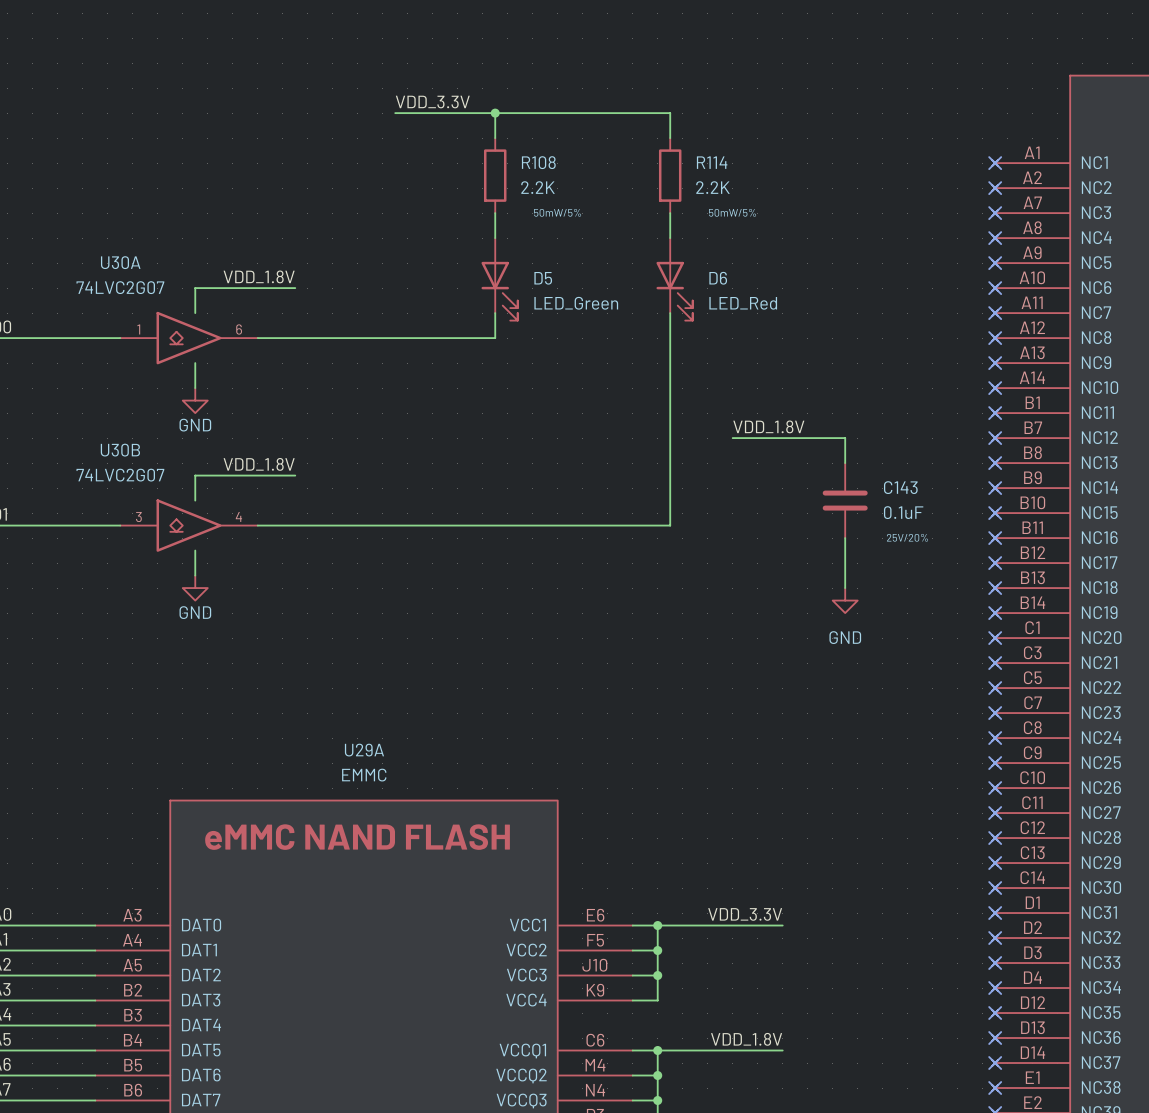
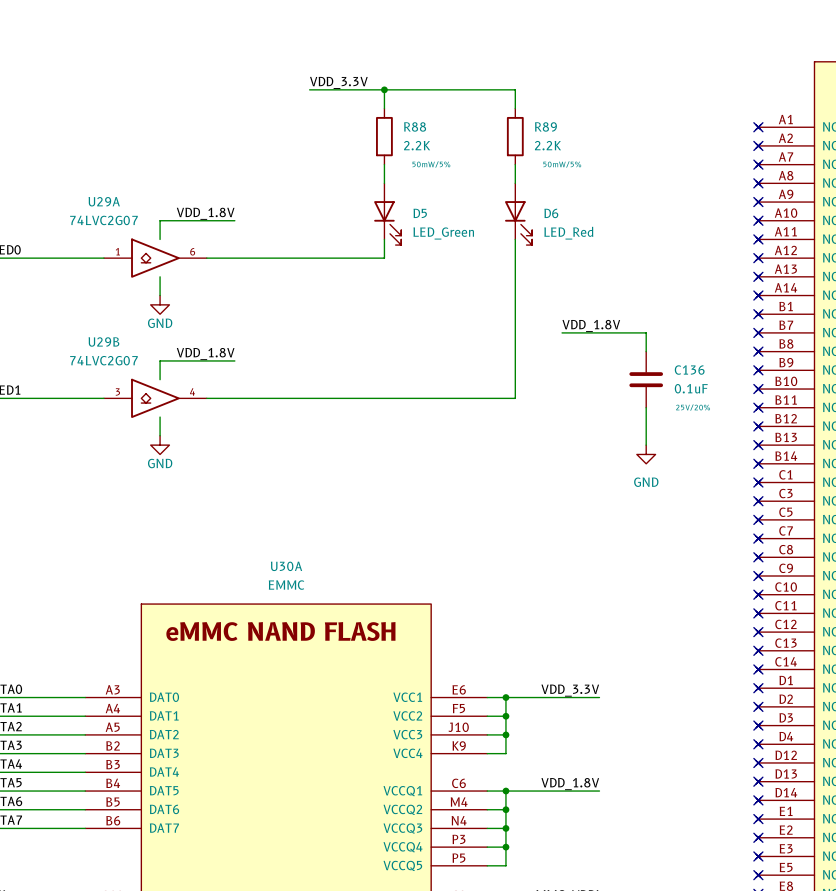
R108 name: R108 (538, 162) -> R88 (415, 126)
R114 name: R114 (712, 162) -> R89 (545, 126)
U30A name: U30A (120, 262) -> U29A (104, 201)
U30B name: U30B (120, 450) -> U29B (103, 341)
C143 name: C143 (900, 487) -> C136 (689, 370)
U29A name: U29A (364, 750) -> U30A (286, 566)

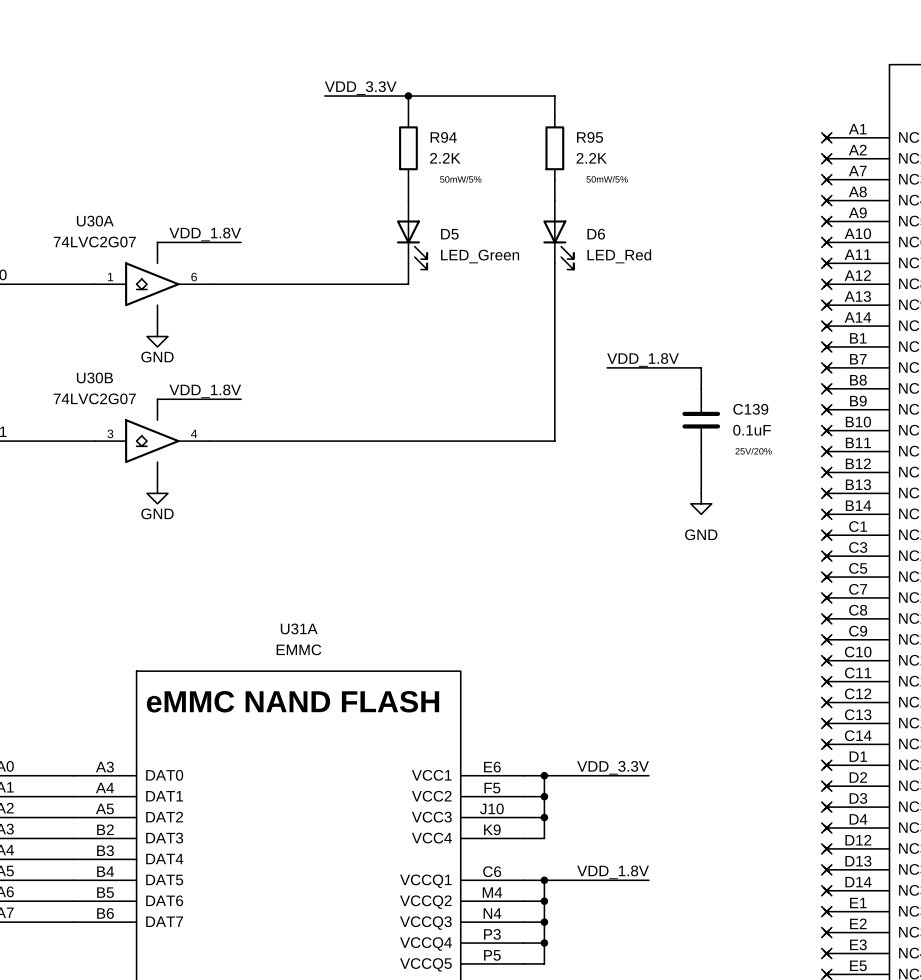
R88 name: R88 (415, 126) -> R94 (443, 137)
R89 name: R89 (545, 126) -> R95 (590, 137)
U29A name: U29A (104, 201) -> U30A (95, 221)
U29B name: U29B (103, 341) -> U30B (94, 377)
C136 name: C136 (689, 370) -> C139 (750, 409)
U30A name: U30A (286, 566) -> U31A (299, 628)

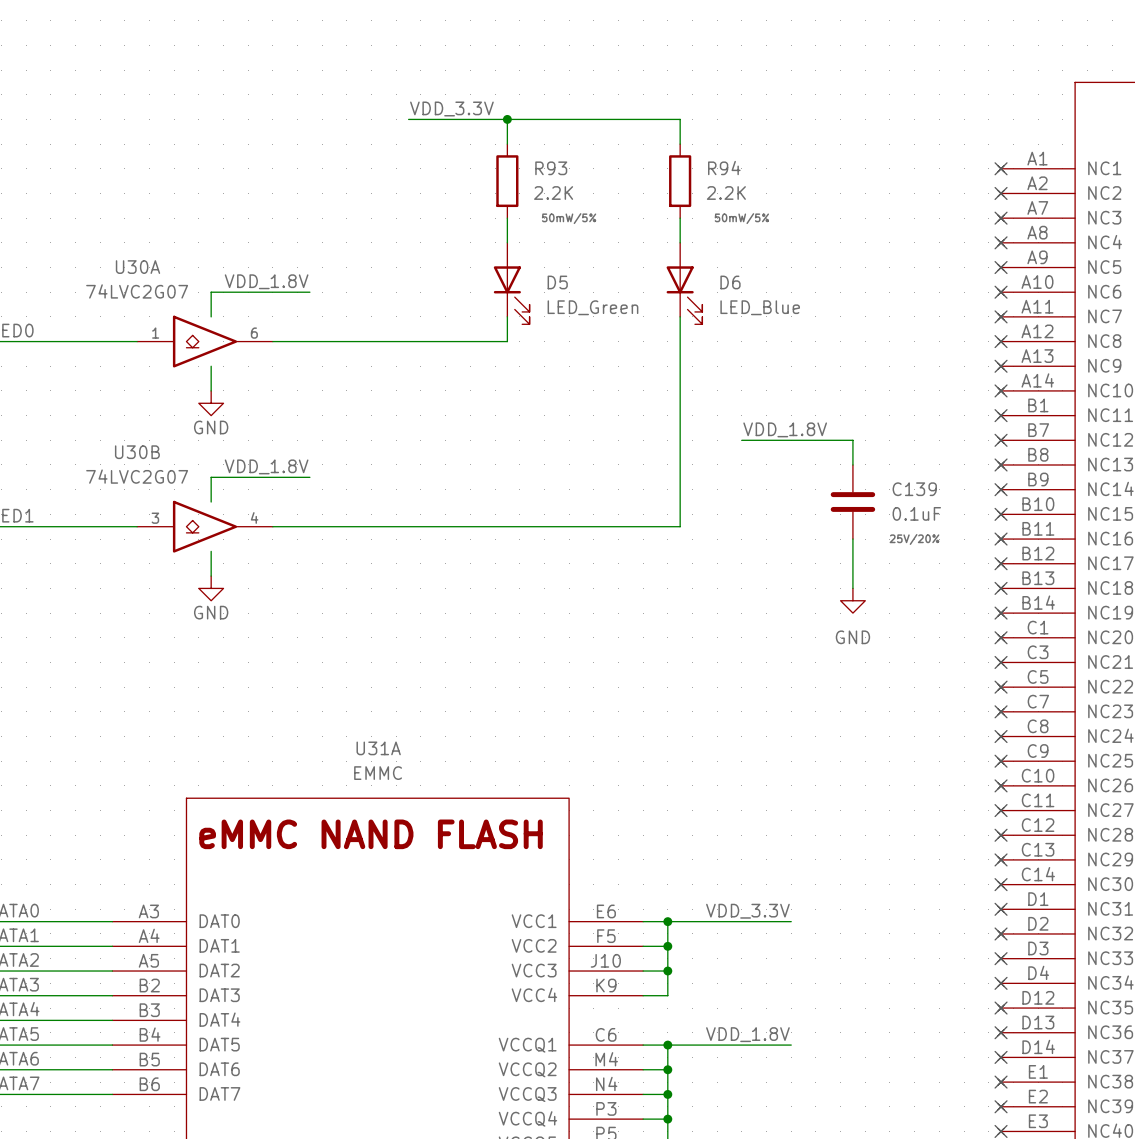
R94 name: R94 (443, 137) -> R93 (551, 168)
R95 name: R95 (590, 137) -> R94 (724, 168)
D6 value: LED_Red (619, 256) -> LED_Blue (760, 307)

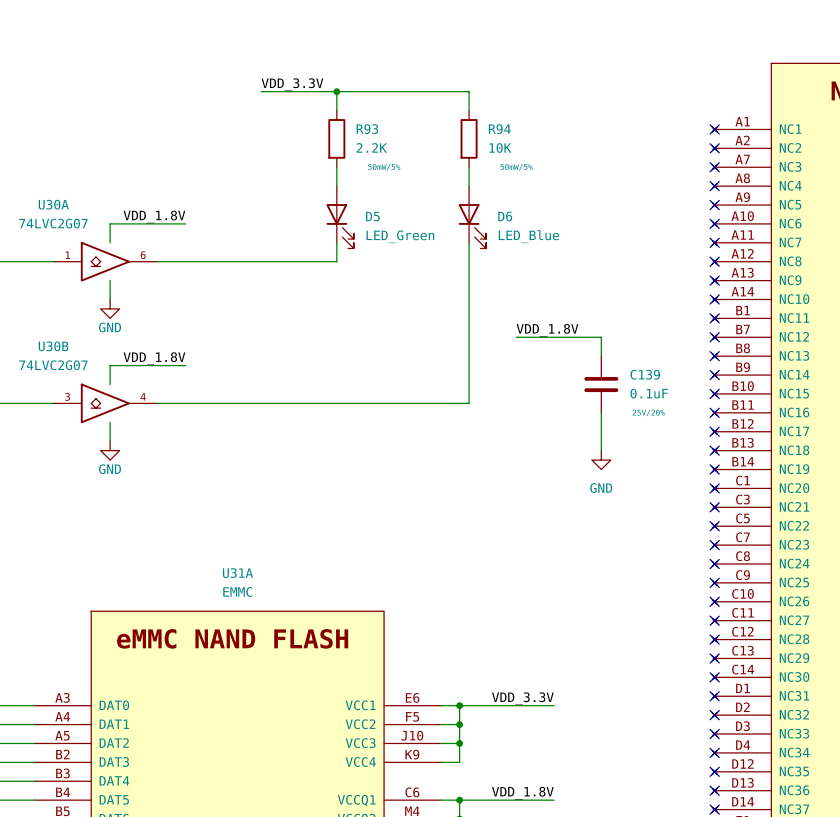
R94 value: 2.2K (726, 193) -> 10K (500, 148)

